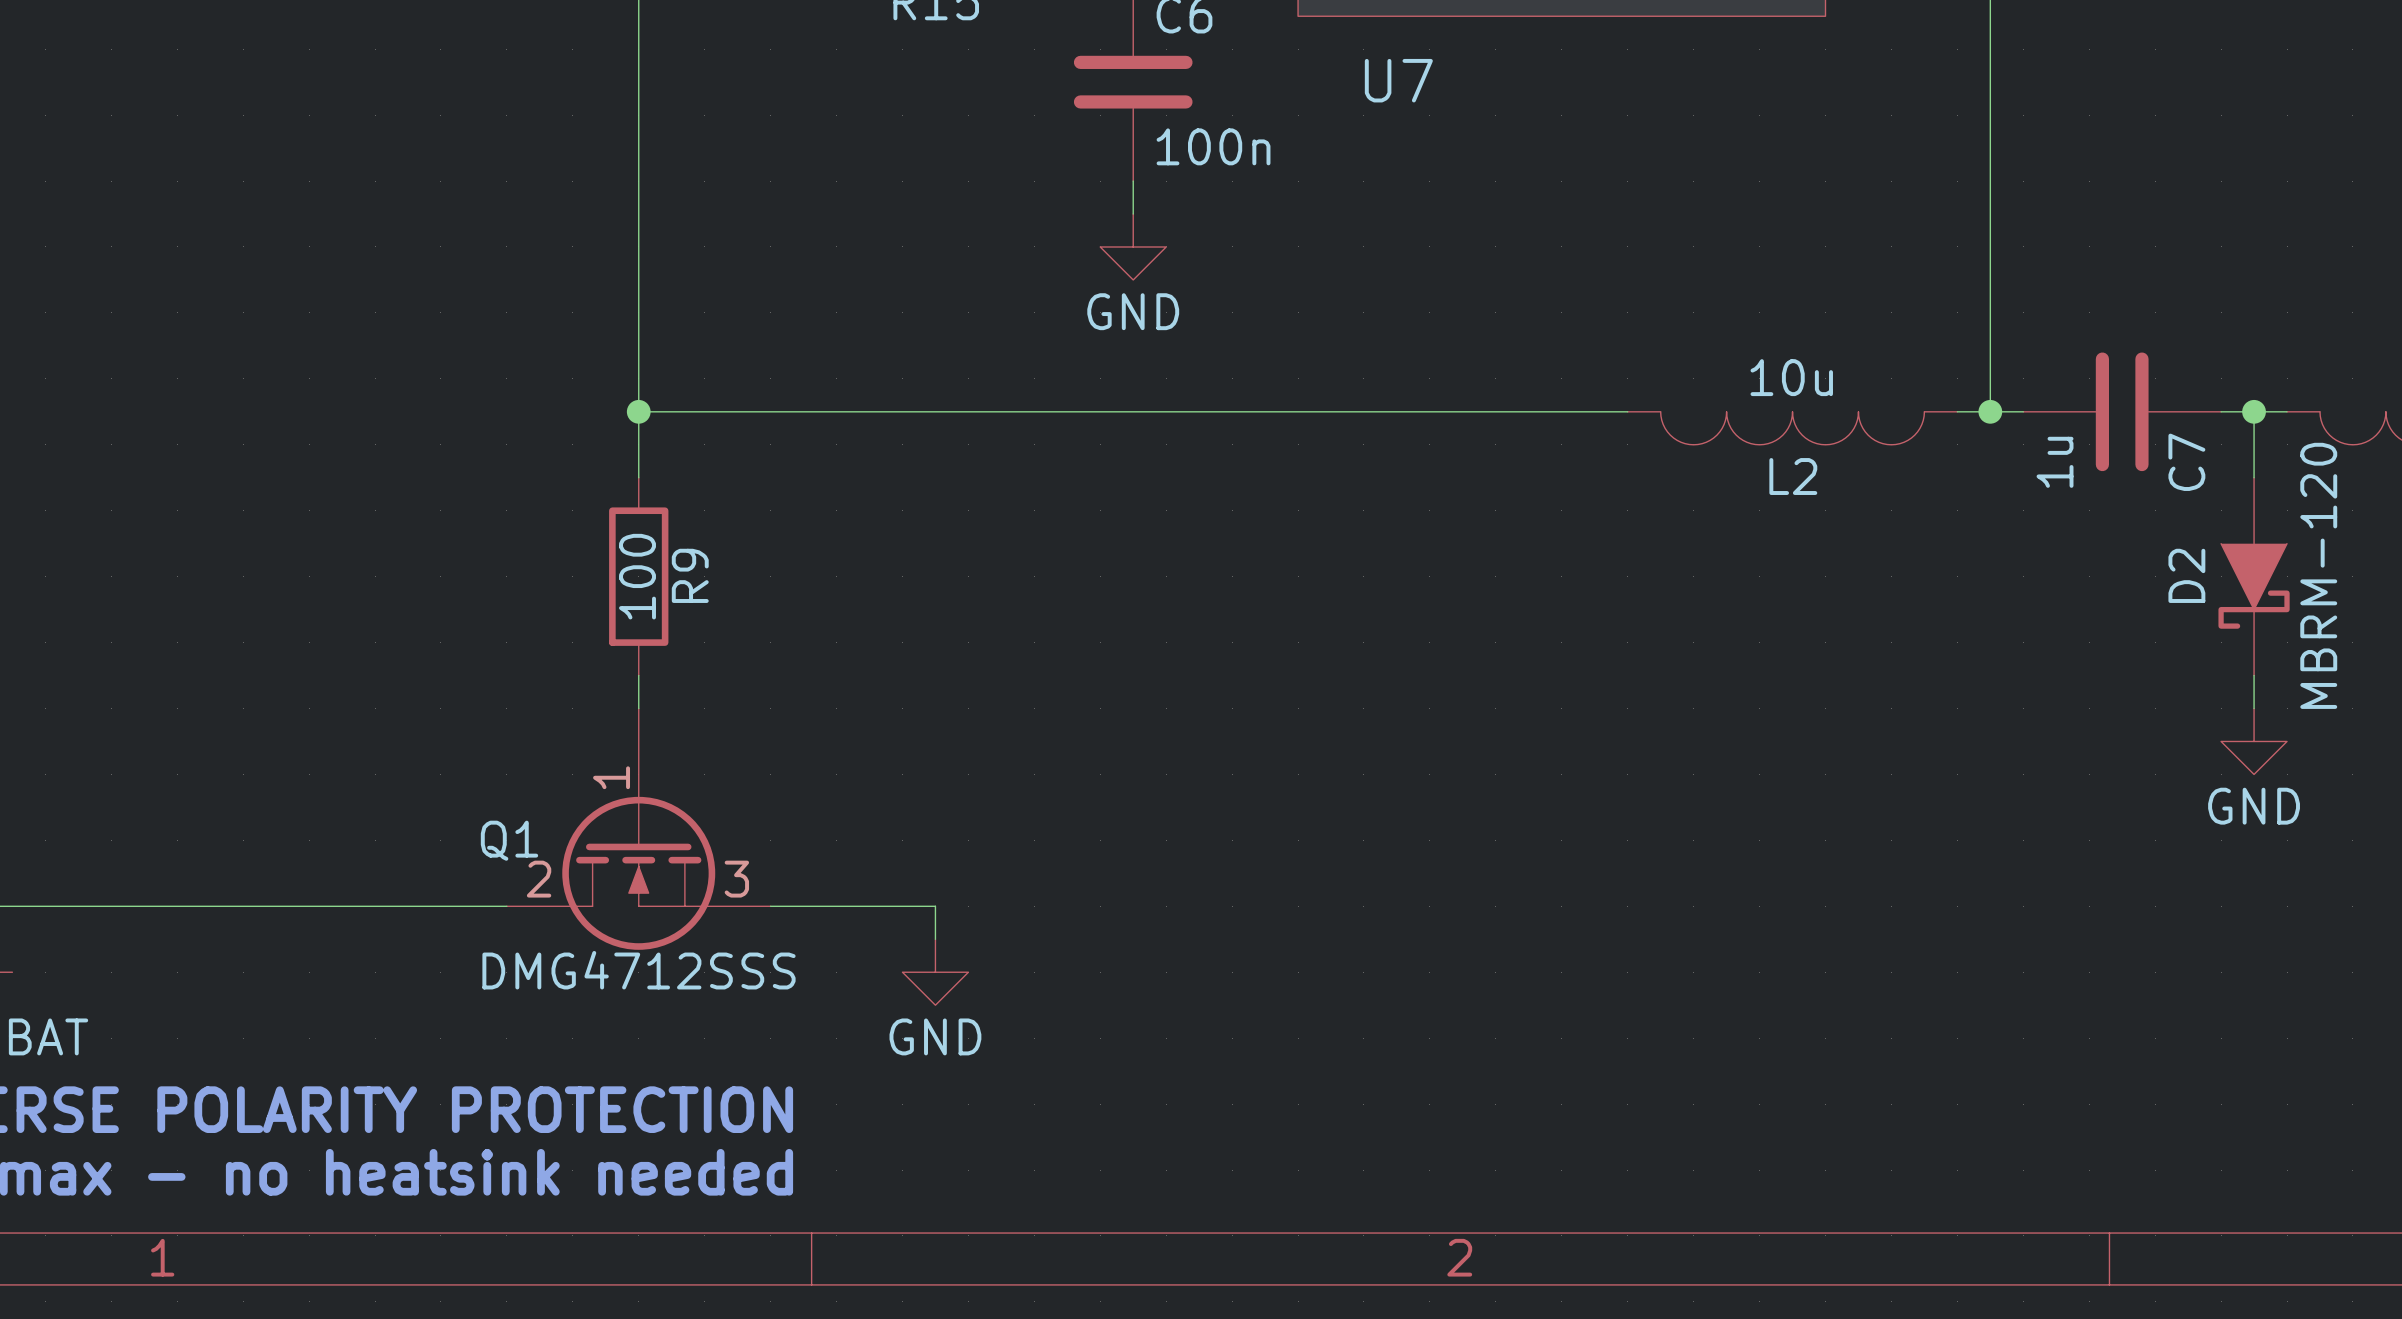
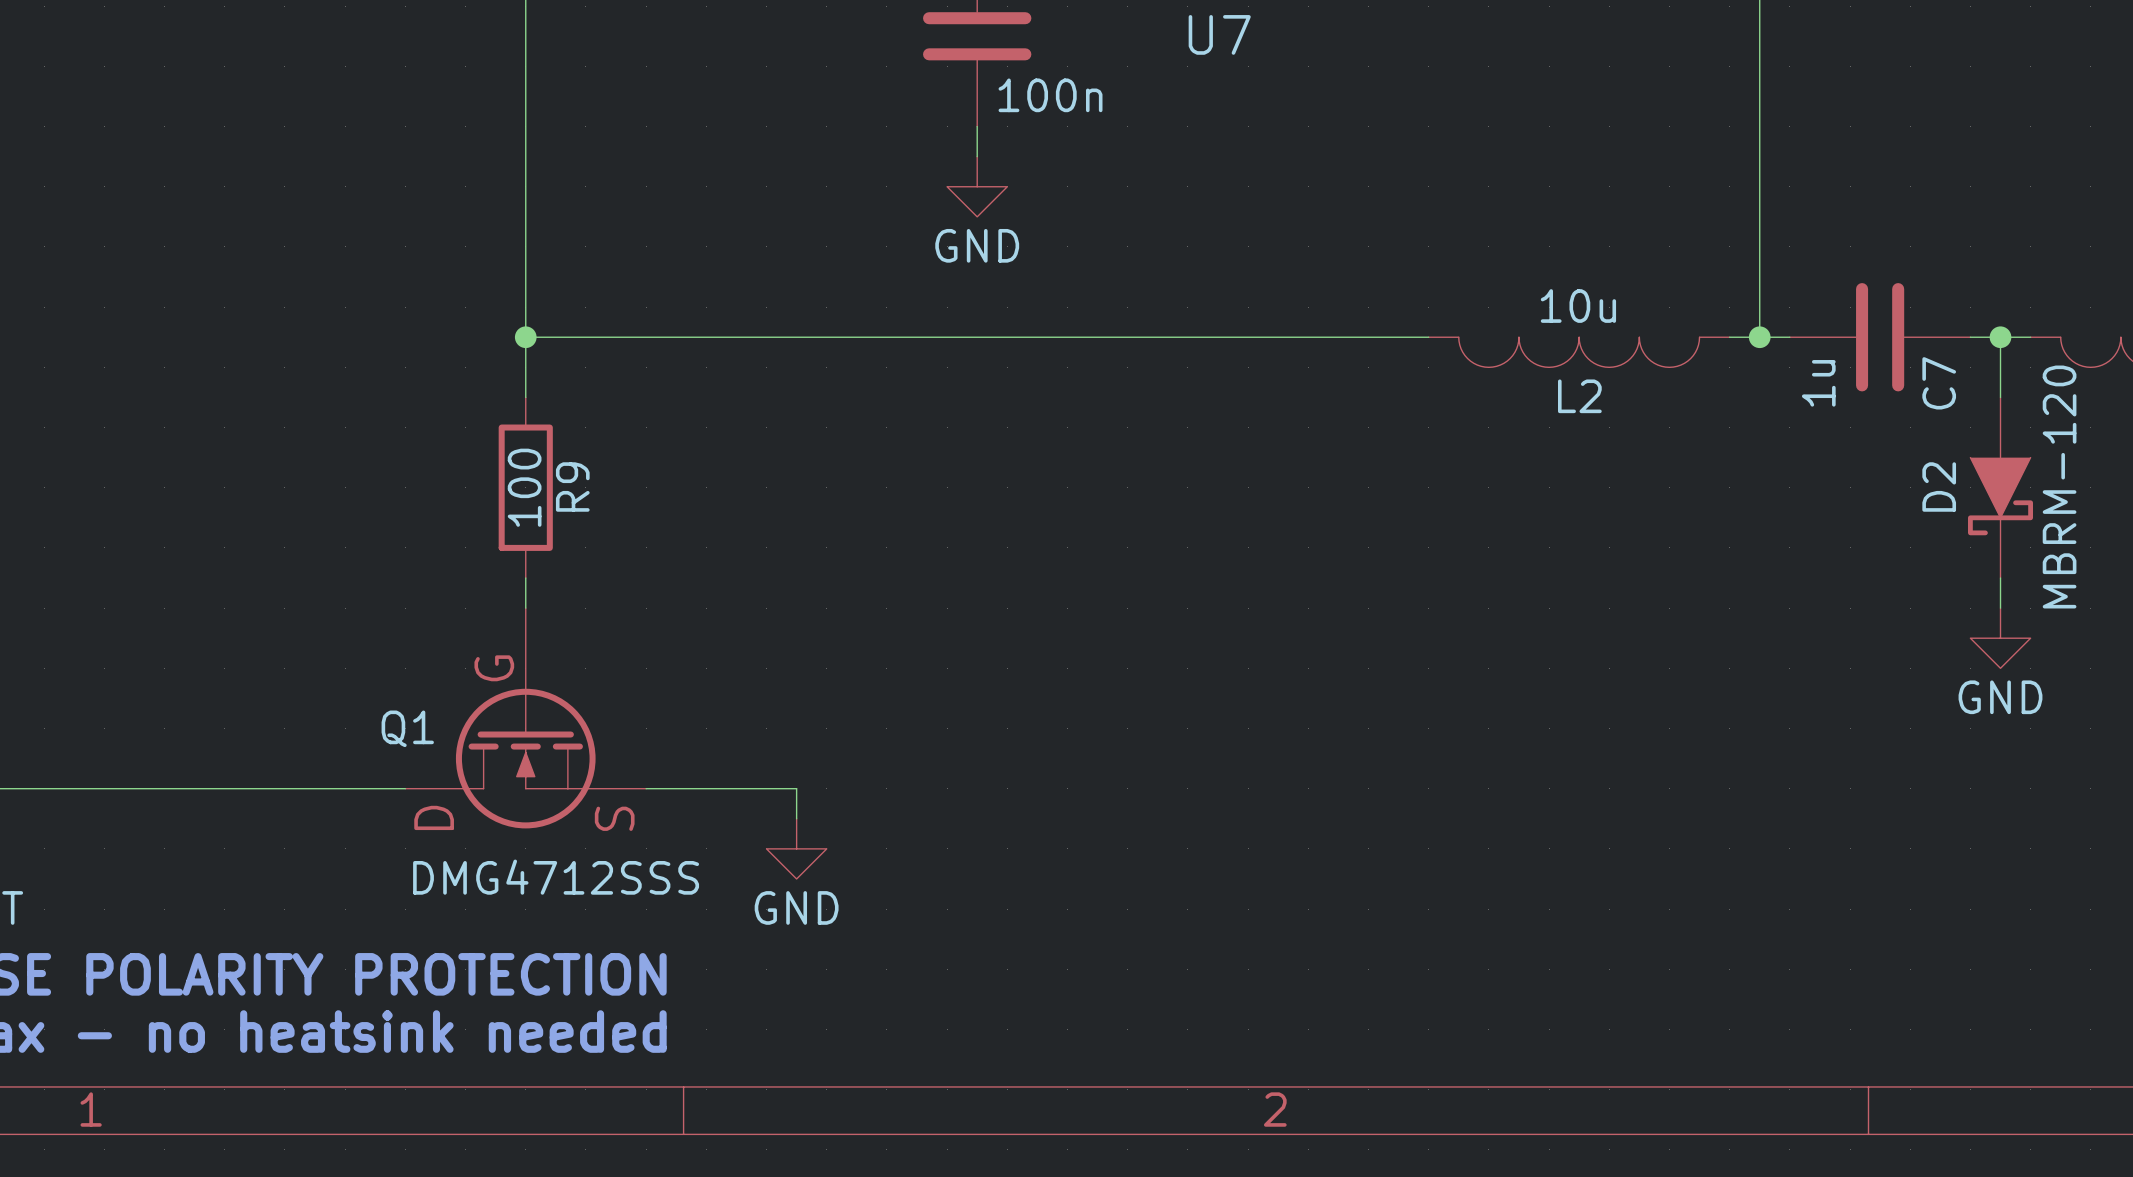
Q1 text: none -> G (494, 668)
Q1 pin number: 1 (611, 777) -> none
Q1 pin number: 2 (539, 879) -> none
Q1 pin number: 3 (736, 879) -> none
Q1 text: none -> D (434, 817)
Q1 text: none -> S (614, 818)
Q1 value position: DMG4712SSS (638, 970) -> DMG4712SSS (556, 877)

